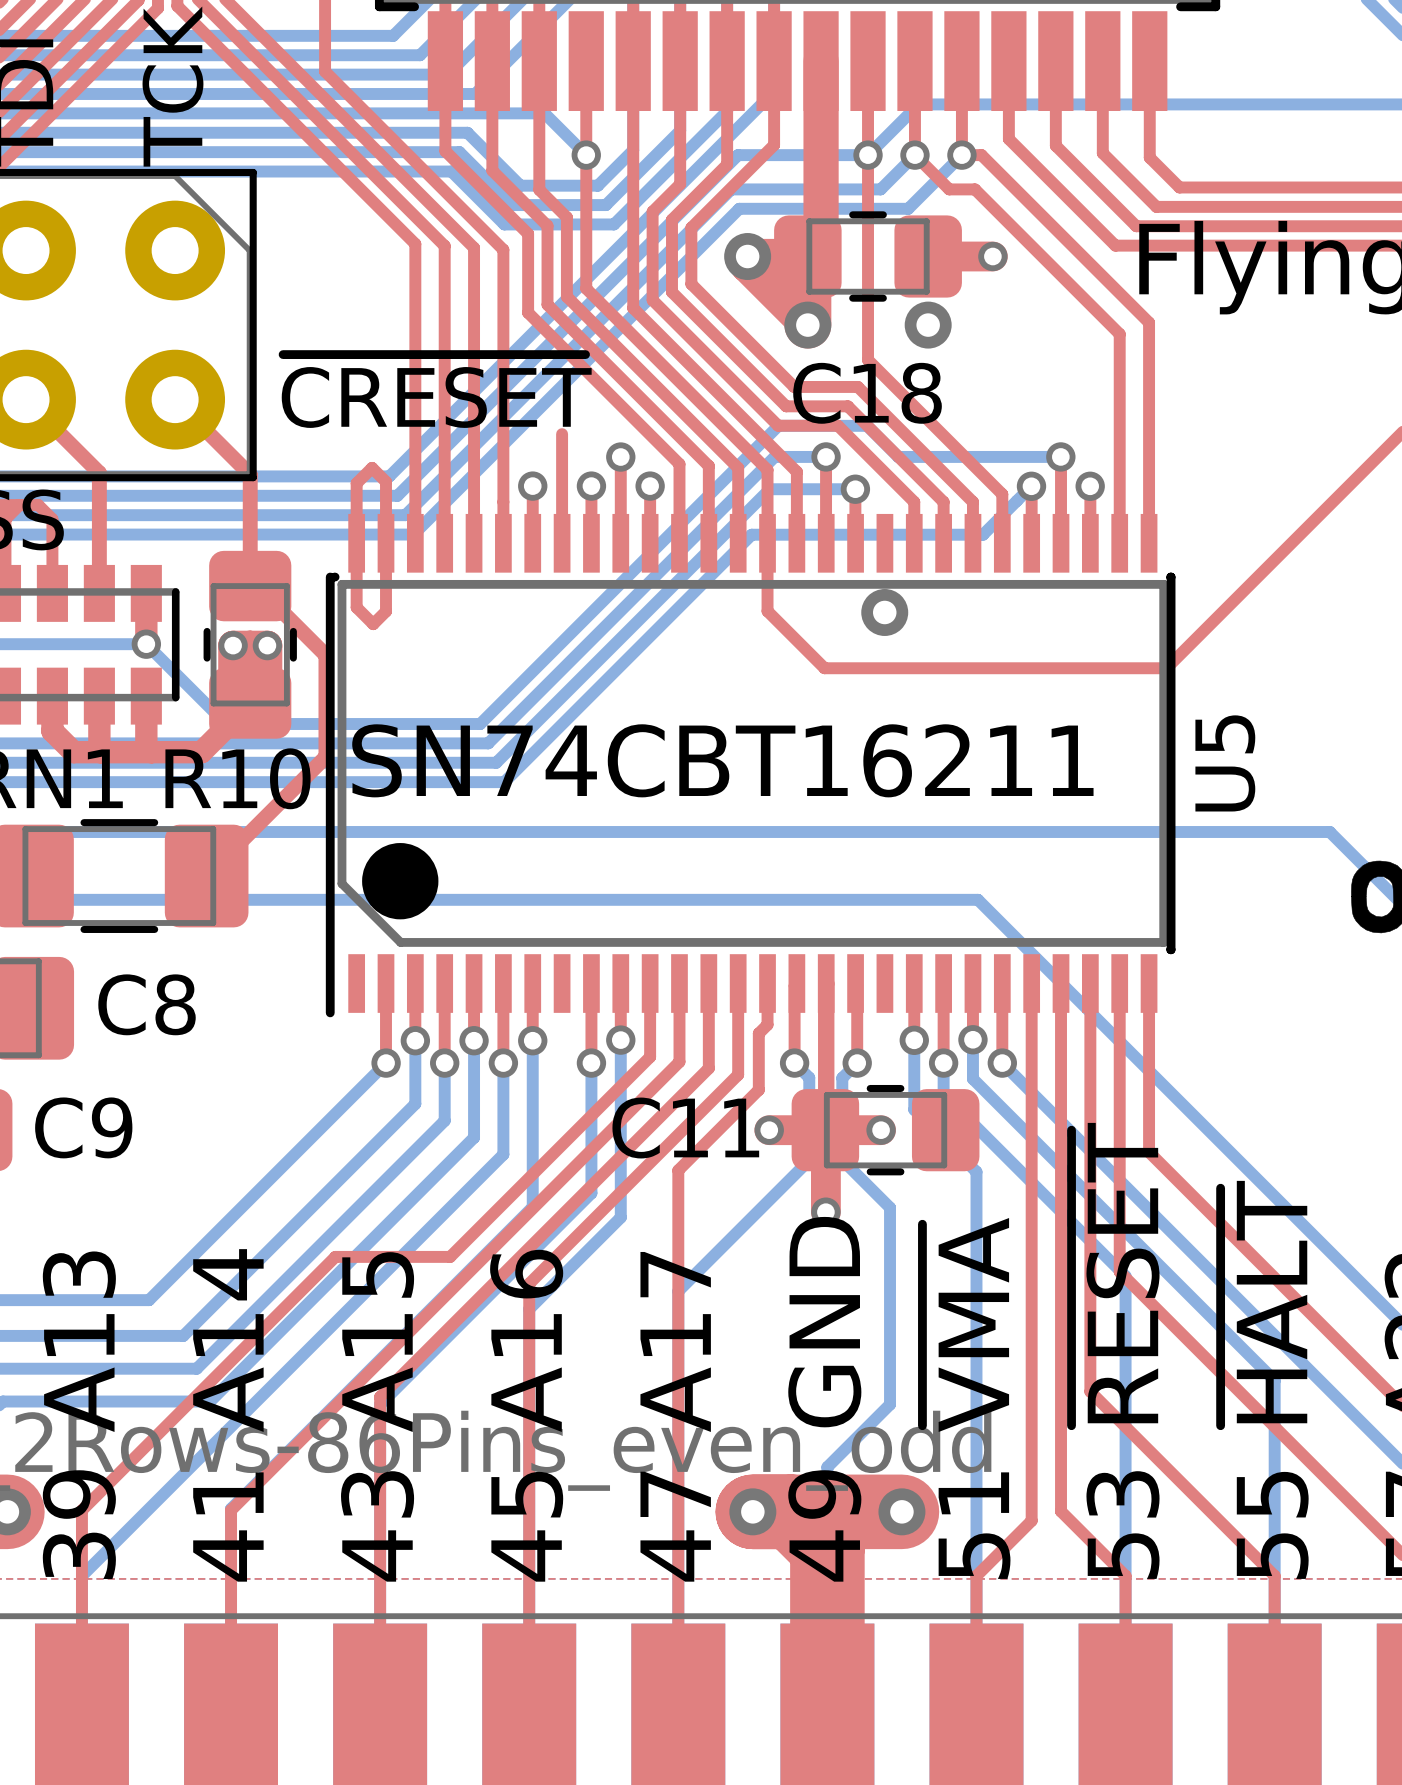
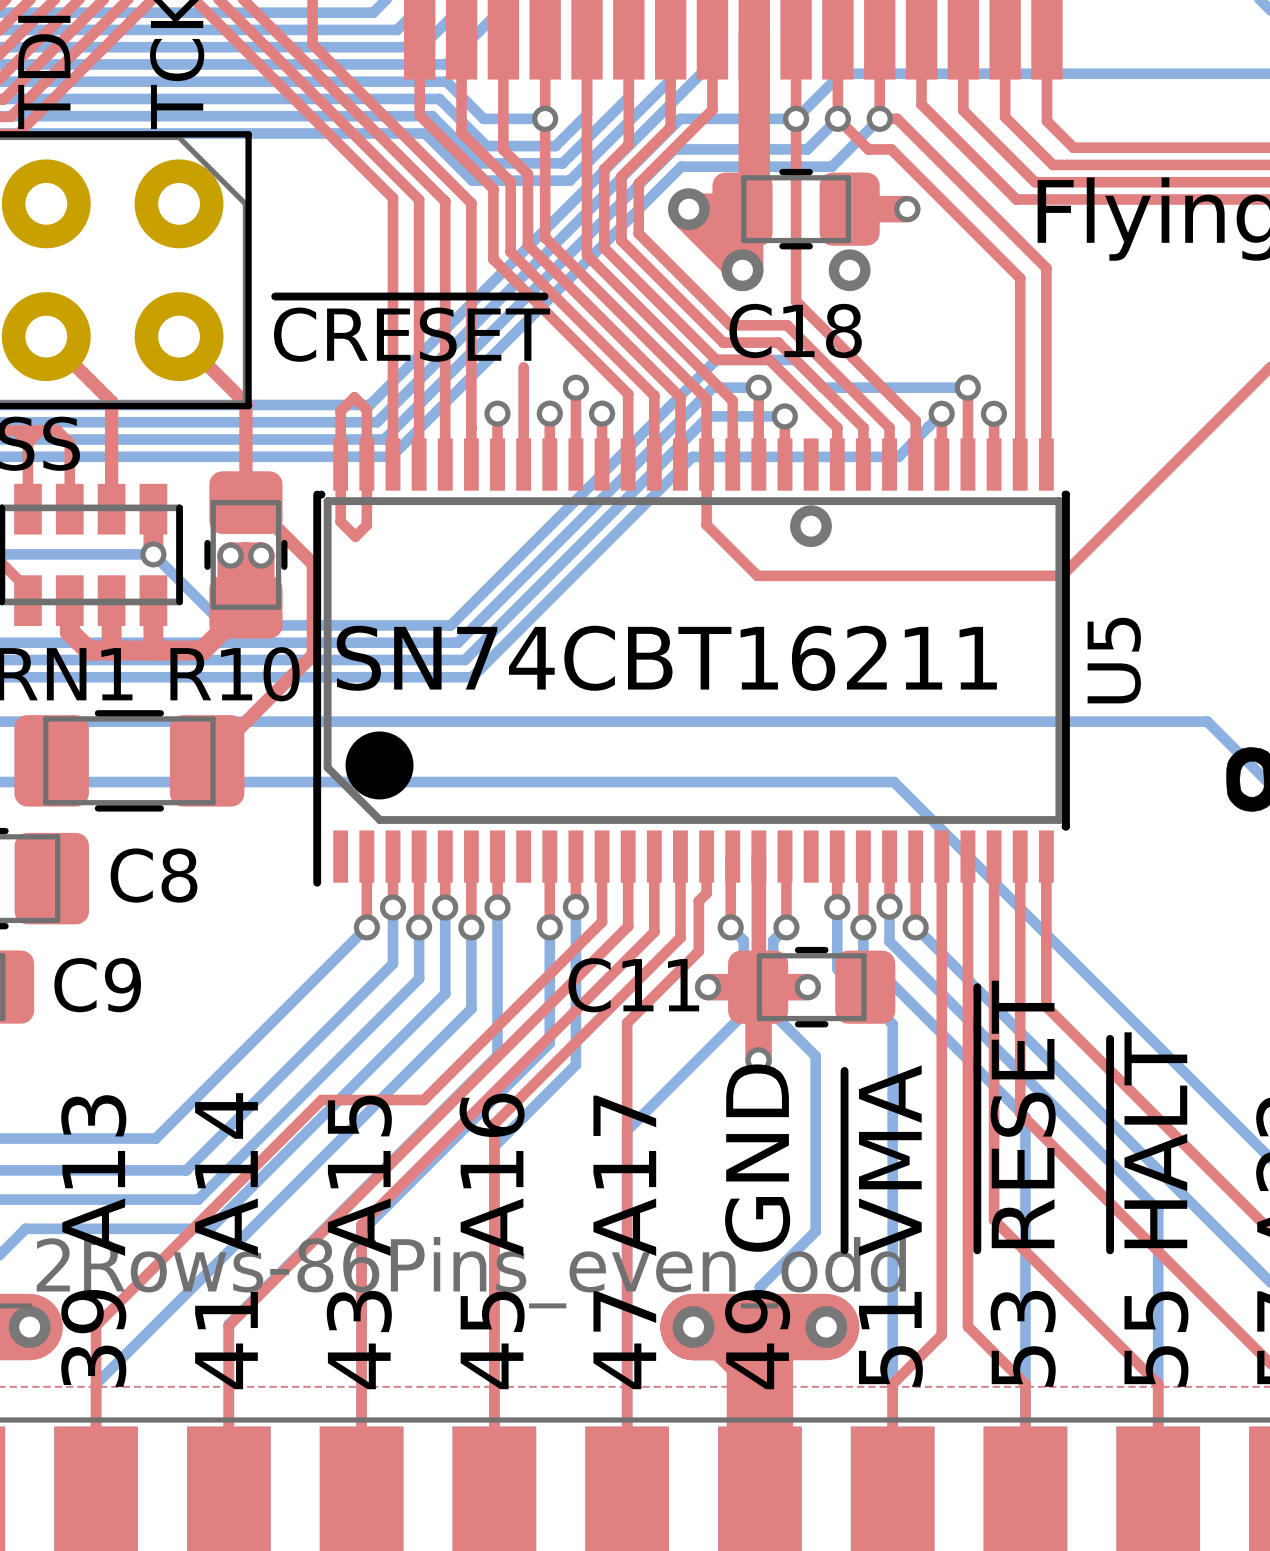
bottom track: (475, 113) (544, 113) (586, 155) -> (446, 81) (483, 118) (545, 118)

